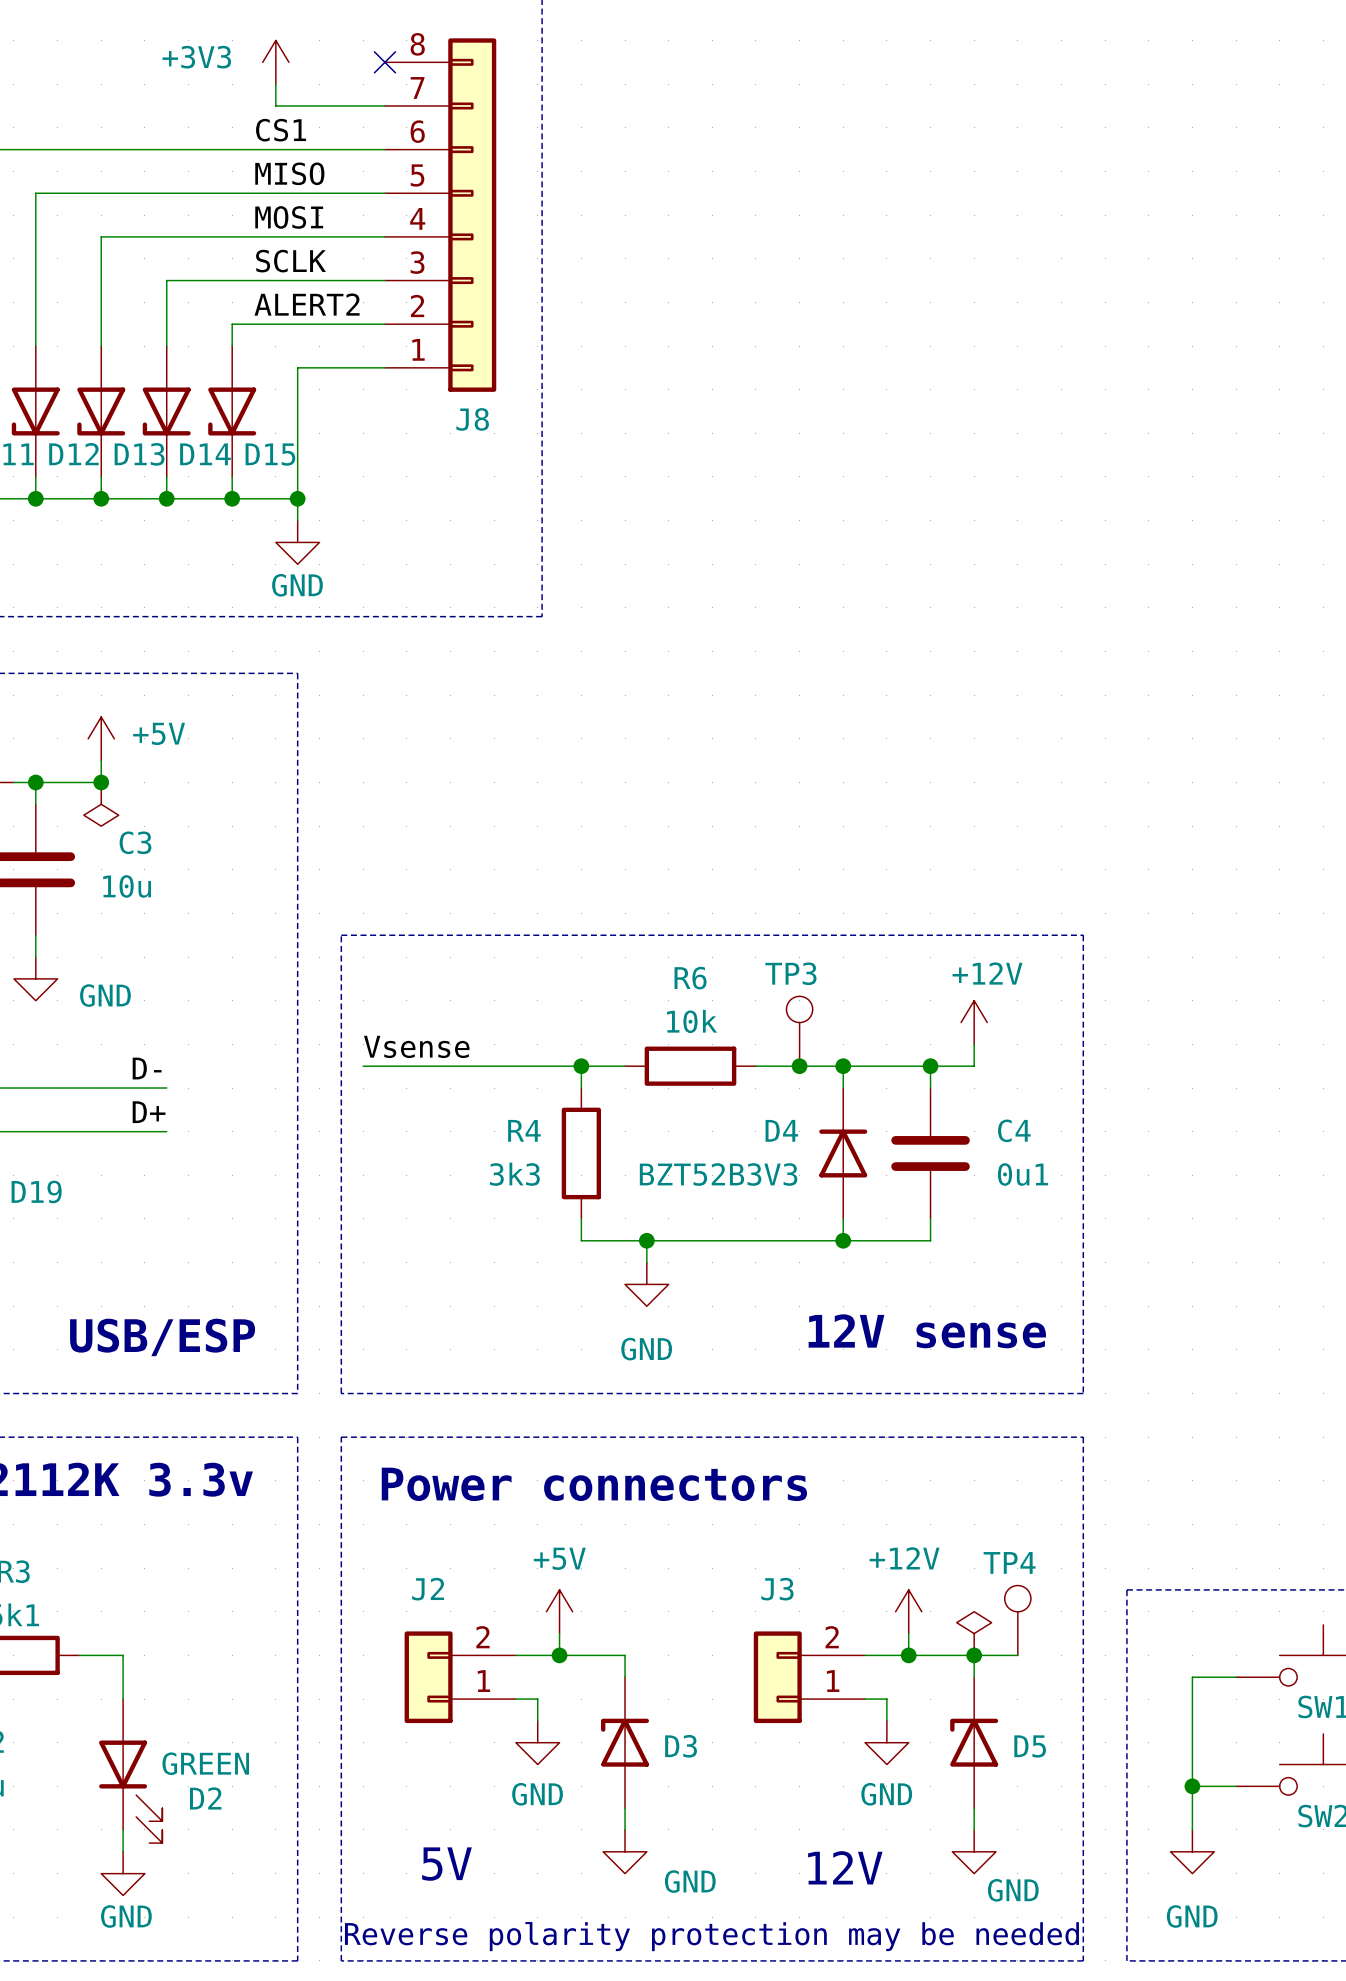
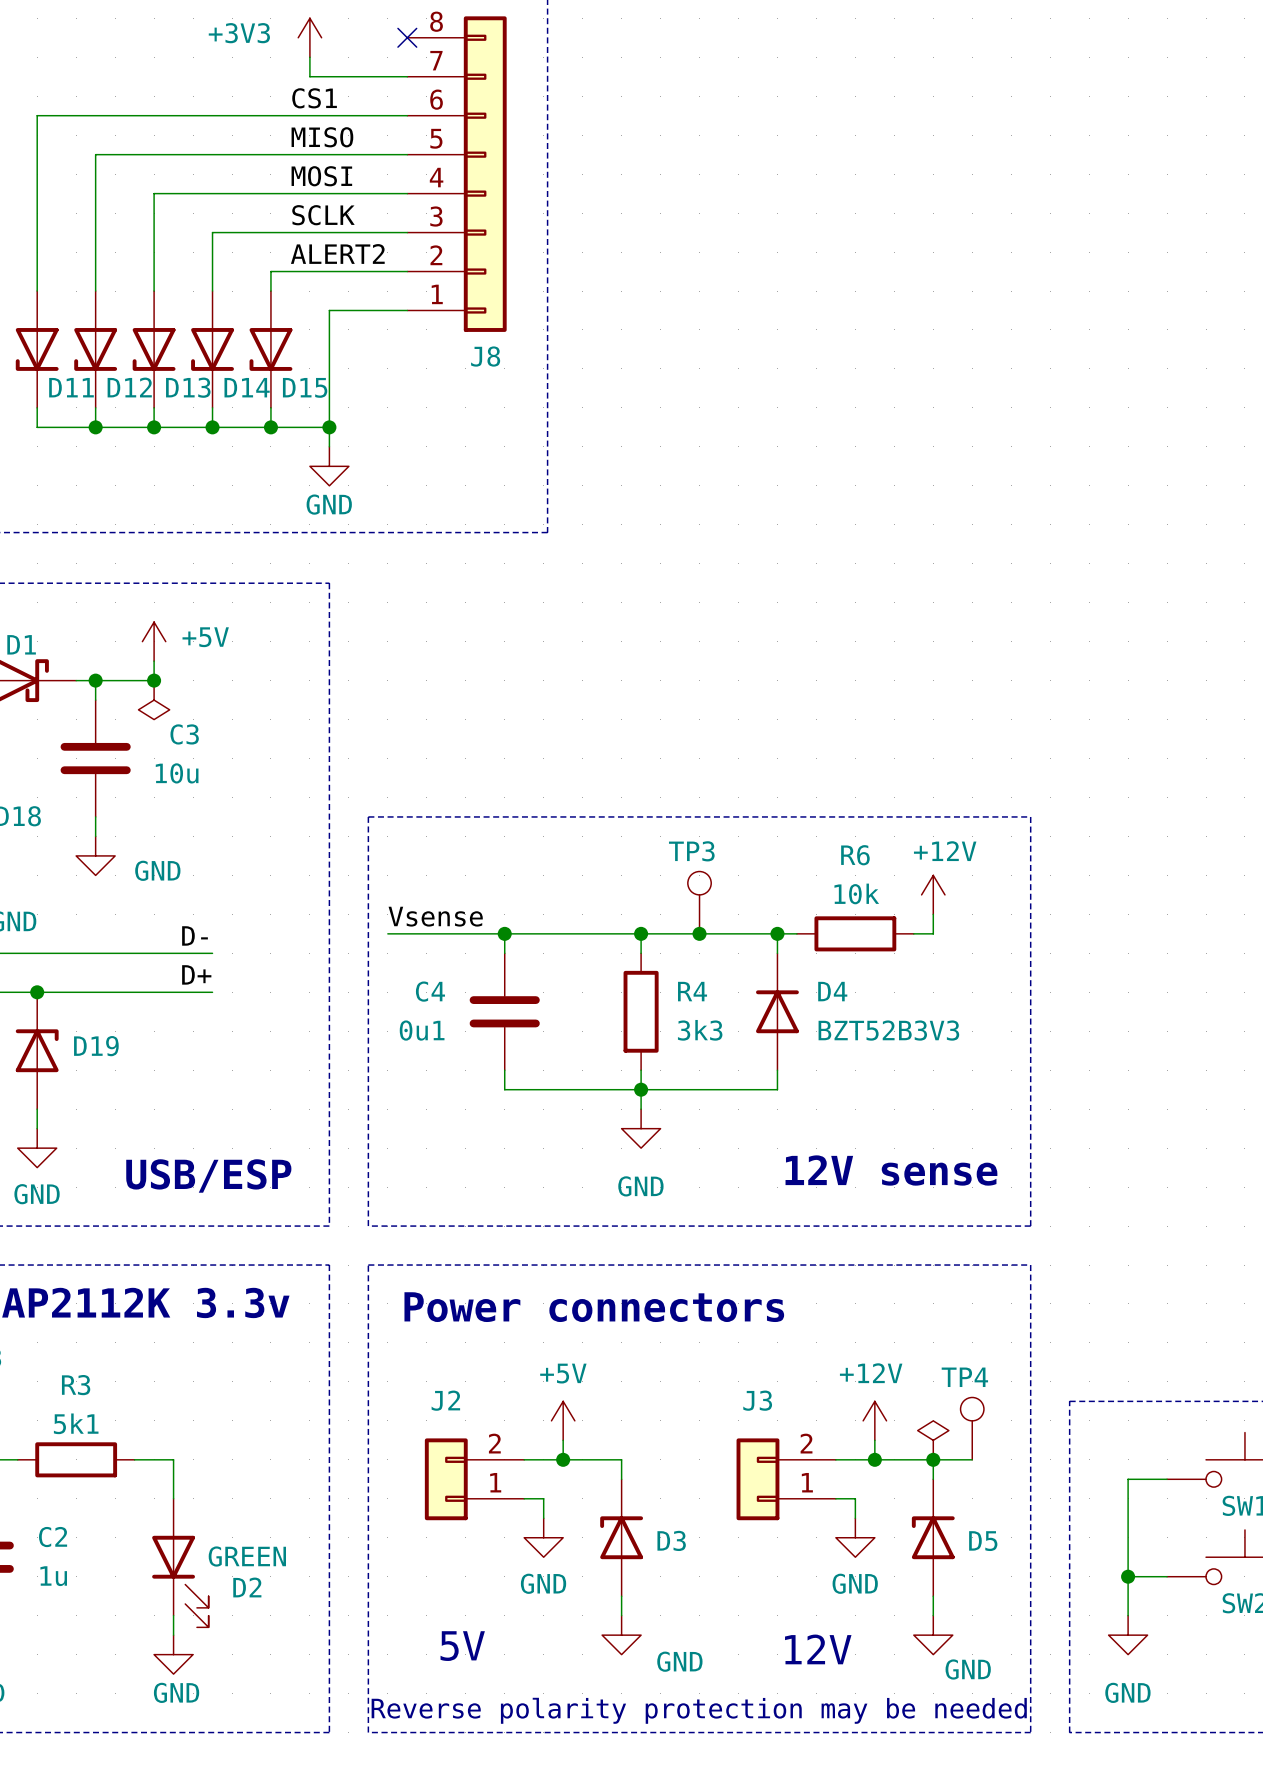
TP3 position: (799, 1031) -> (699, 902)
wire: none -> (504, 933) (504, 953)
junction: none -> (504, 933)
wire: (581, 1066) (581, 1088) -> (777, 933) (777, 953)
junction: (581, 1066) -> none
junction: none -> (641, 933)
R6 position: (690, 1066) -> (855, 933)
junction: none -> (699, 933)
wire: (821, 1066) (952, 1066) -> (621, 933) (738, 933)
junction: (843, 1066) -> none
junction: (930, 1066) -> none
R4 name position: R4 (524, 1130) -> R4 (692, 991)
D4 name position: D4 (781, 1130) -> D4 (832, 991)
C4 name position: C4 (1014, 1130) -> C4 (430, 991)
R4 position: (581, 1153) -> (641, 1011)
D4 position: (843, 1153) -> (777, 1011)
C4 position: (930, 1153) -> (504, 1011)
R4 value position: 3k3 (514, 1174) -> 3k3 (700, 1030)
D4 value position: BZT52B3V3 (718, 1174) -> BZT52B3V3 (888, 1030)
C4 value position: 0u1 (1022, 1174) -> 0u1 (422, 1030)
wire: (581, 1218) (581, 1240) -> (504, 1070) (504, 1089) (582, 1089)
wire: (843, 1218) (843, 1240) -> (641, 1070) (641, 1089)
wire: (930, 1218) (930, 1240) (799, 1240) -> (777, 1070) (777, 1089)
junction: (843, 1240) -> none

